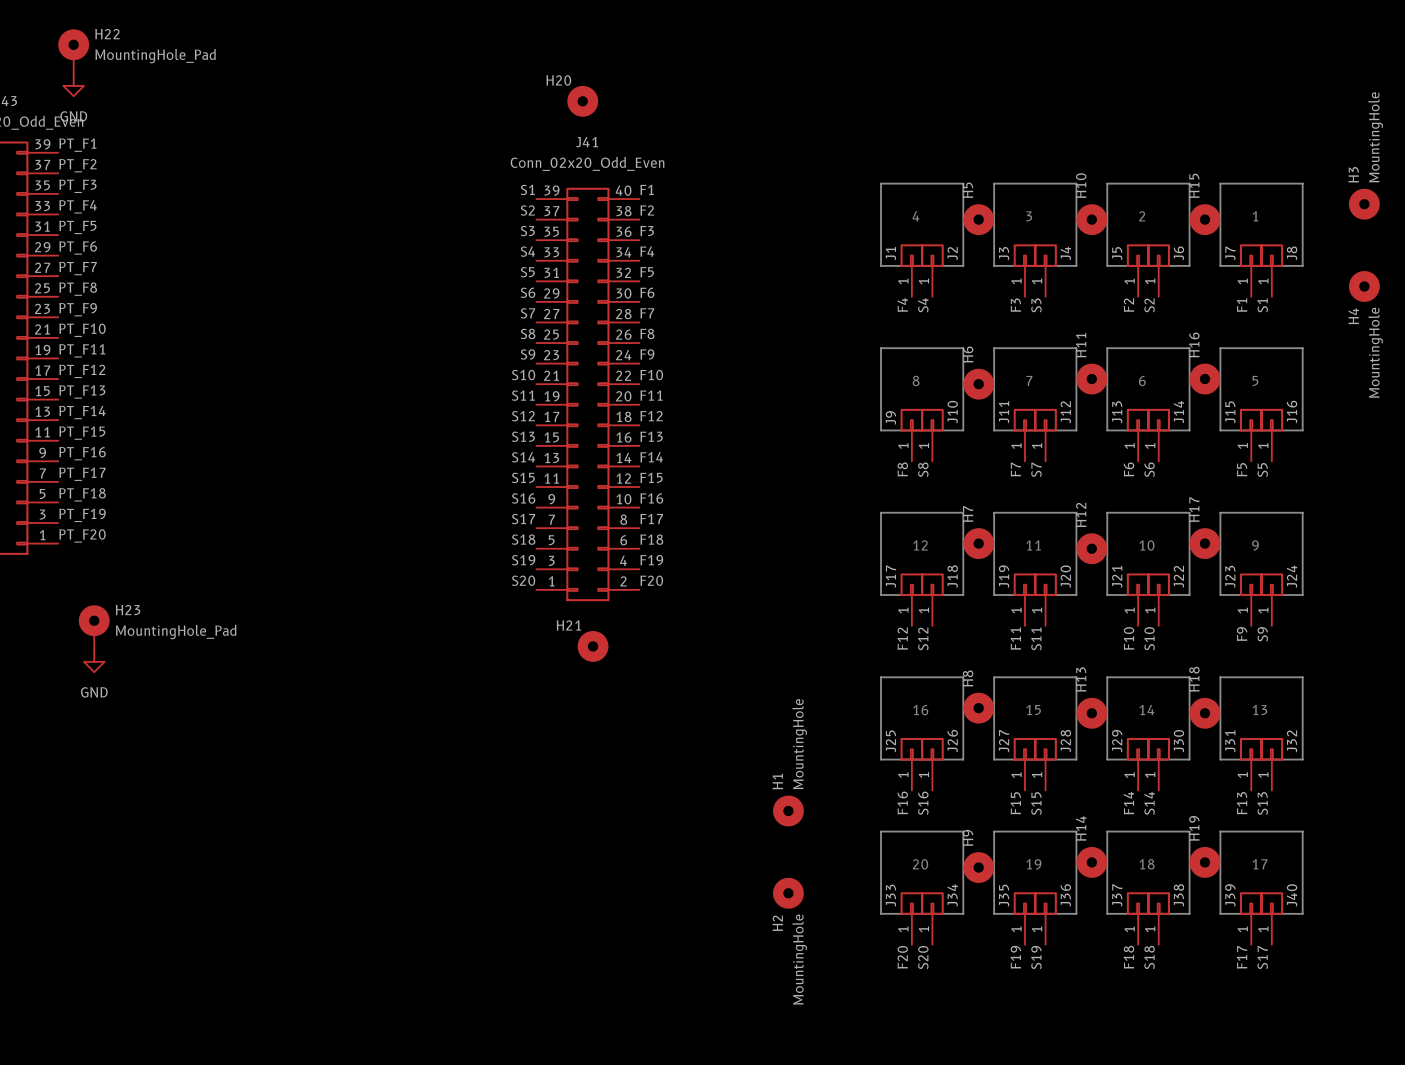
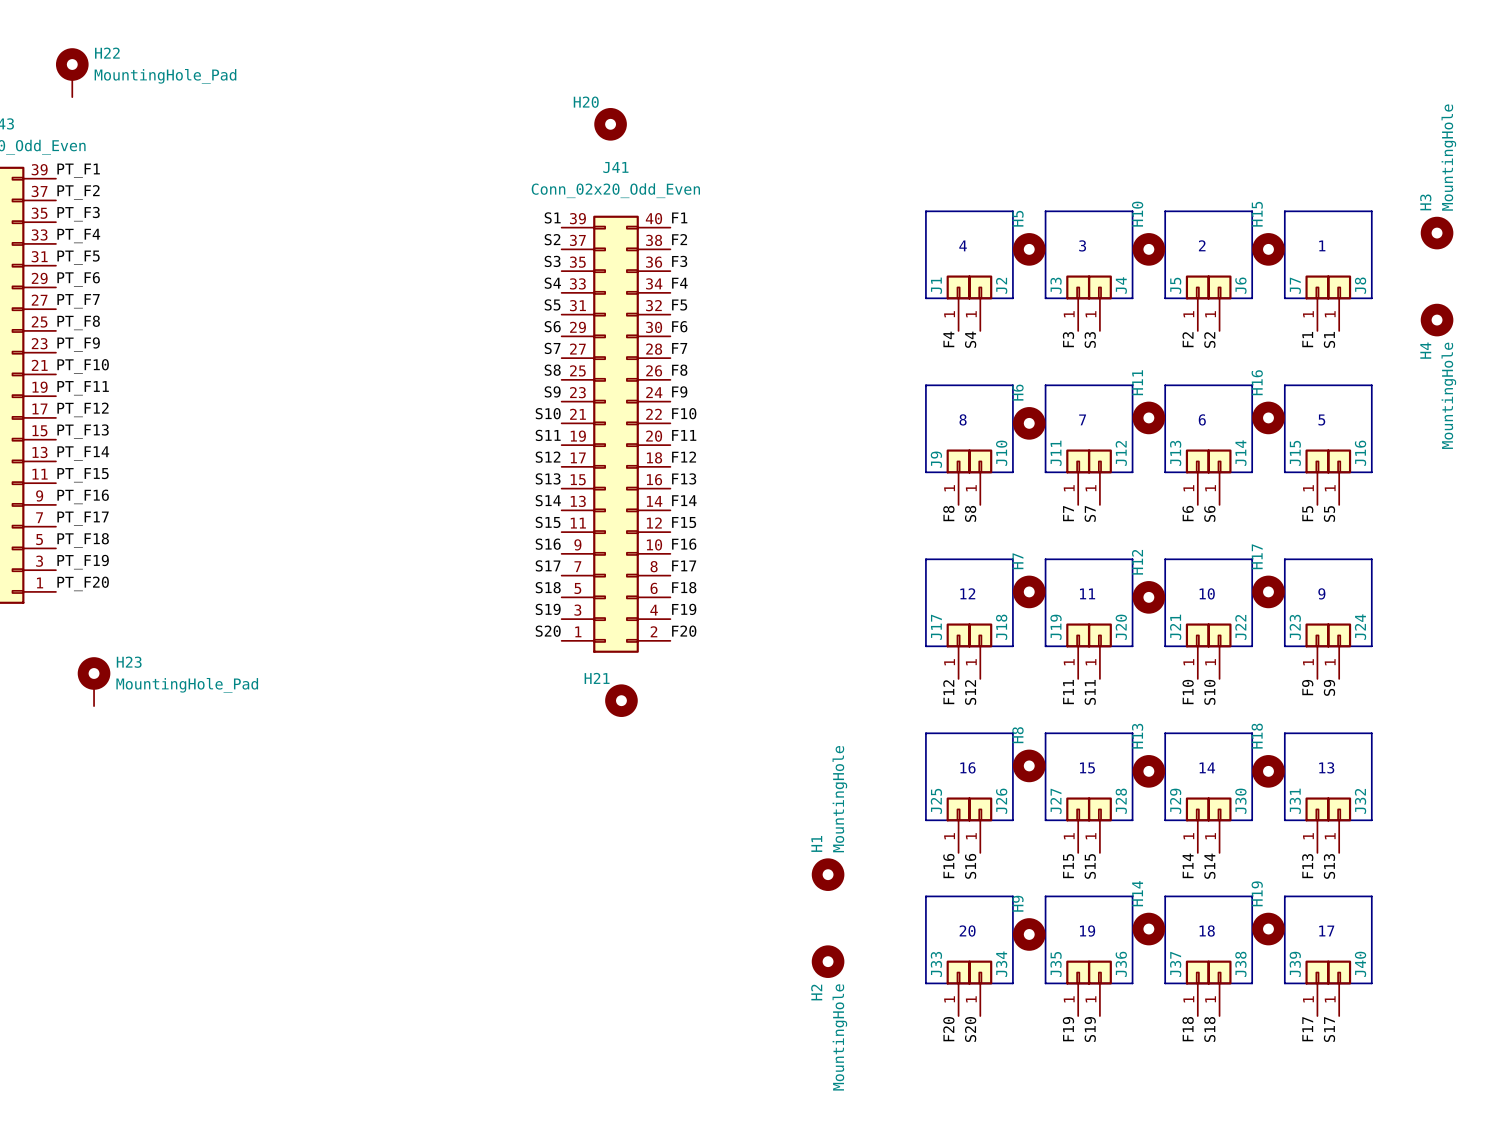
power symbol: GND (73, 85) -> none
power symbol: GND (94, 661) -> none

